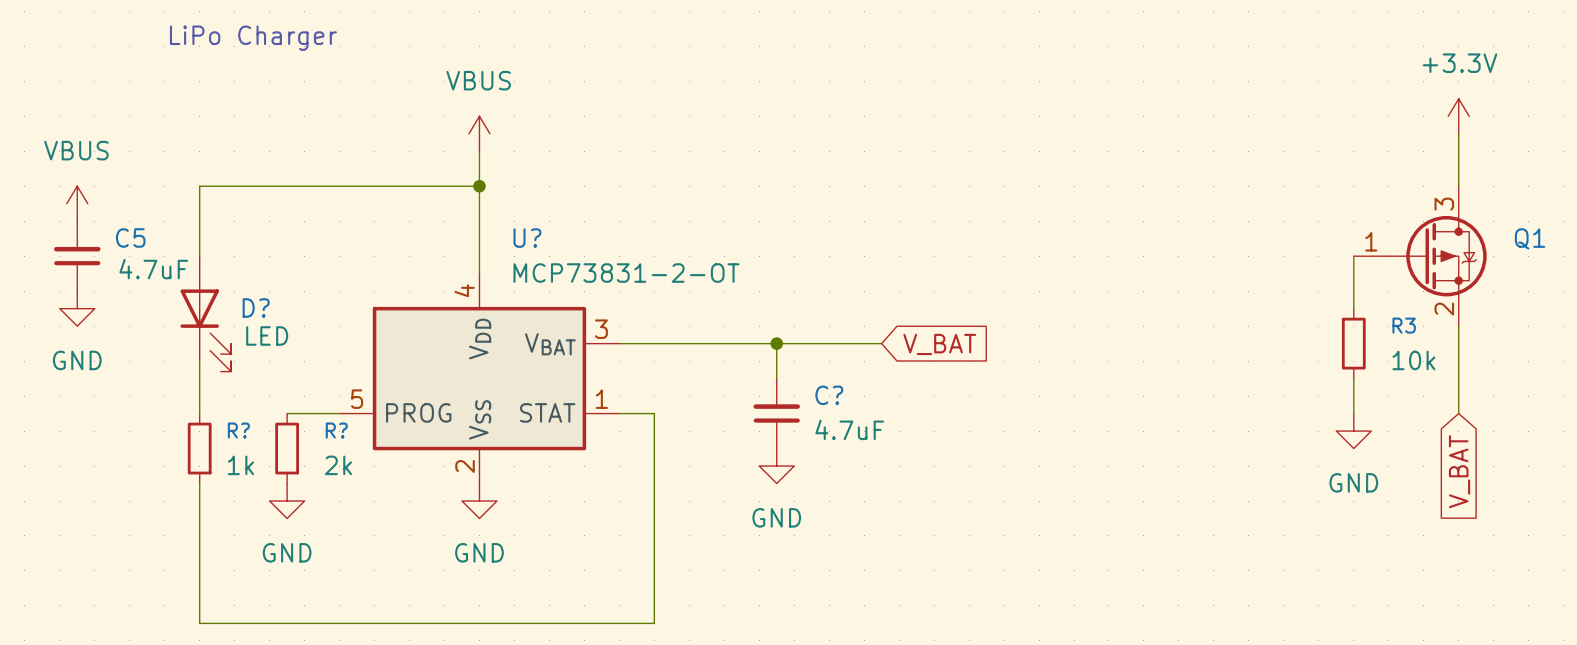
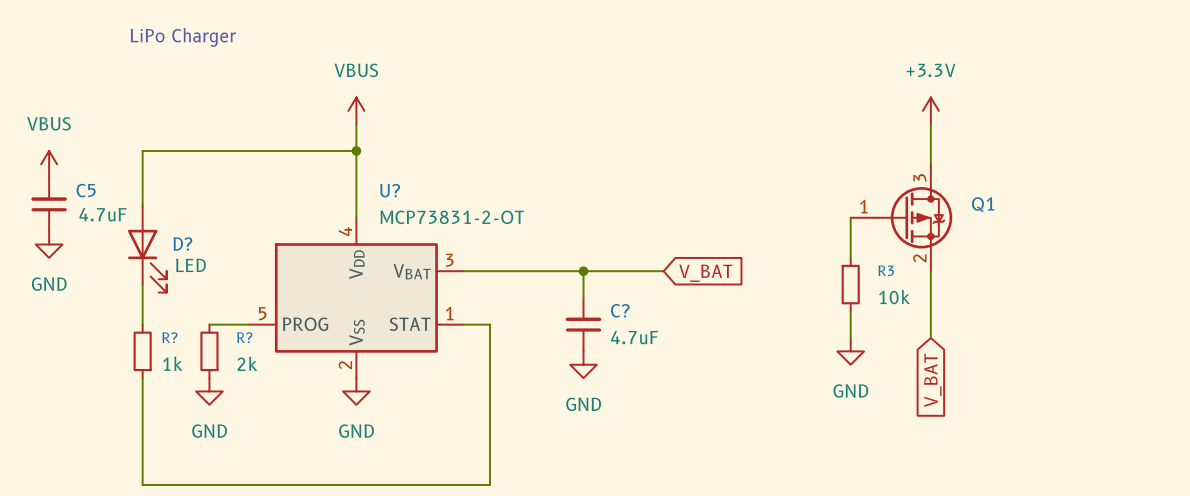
power symbol position: +3.3V (1458, 116) -> +3.3V (930, 110)
wire: (1458, 133) (1458, 186) -> (930, 124) (930, 164)
wire: (1353, 256) (1353, 308) -> (850, 217) (850, 257)
Q1 position: (1420, 256) -> (901, 217)
wire: (1458, 326) (1458, 413) -> (930, 271) (930, 338)
R3 position: (1353, 343) -> (850, 284)
wire: (1353, 378) (1353, 413) -> (850, 311) (850, 338)
power symbol position: GND (1353, 431) -> GND (850, 351)
global label position: V_BAT (1459, 471) -> V_BAT (932, 380)

